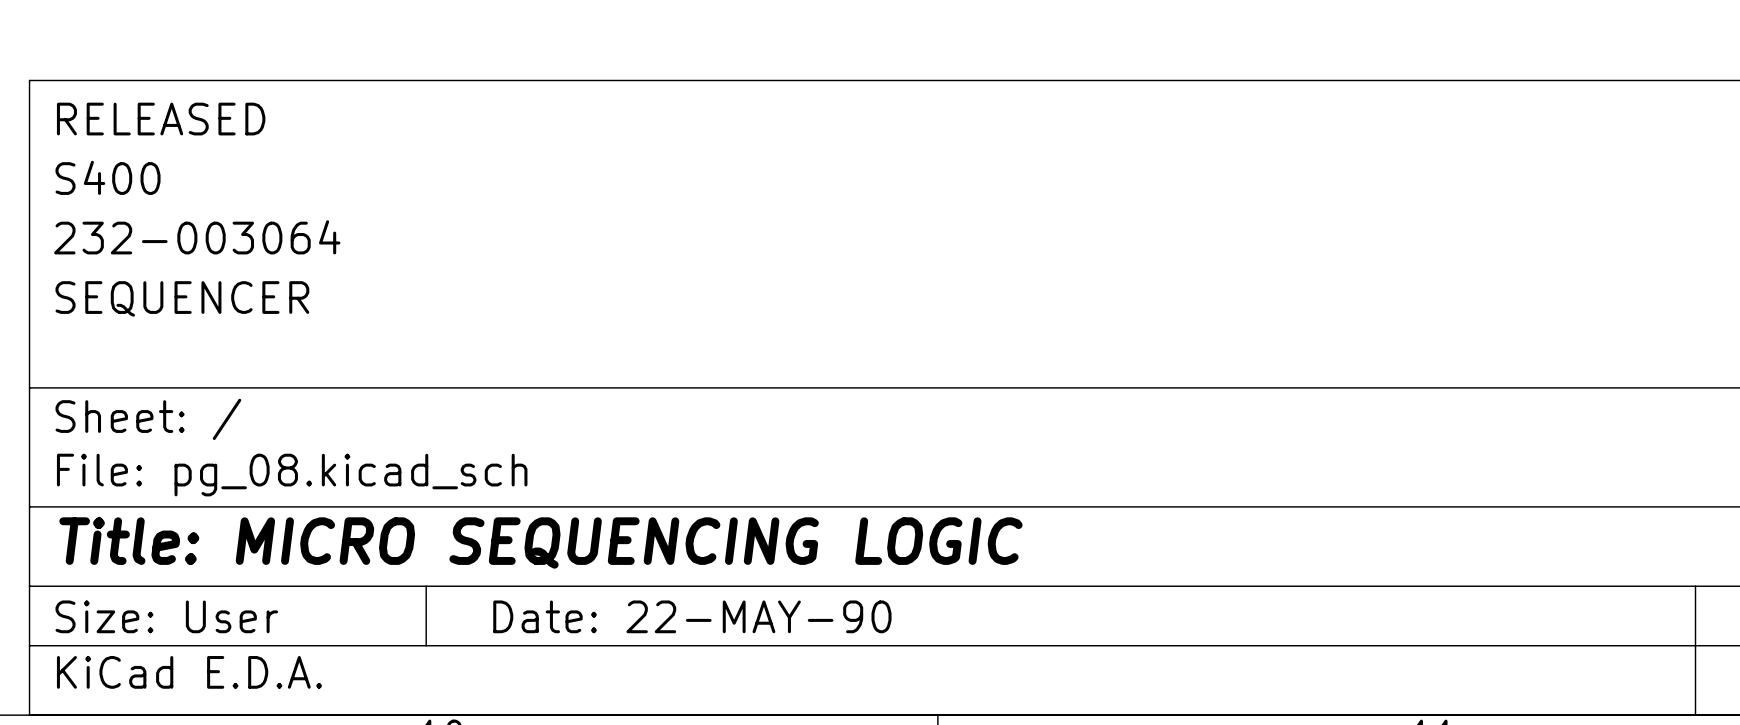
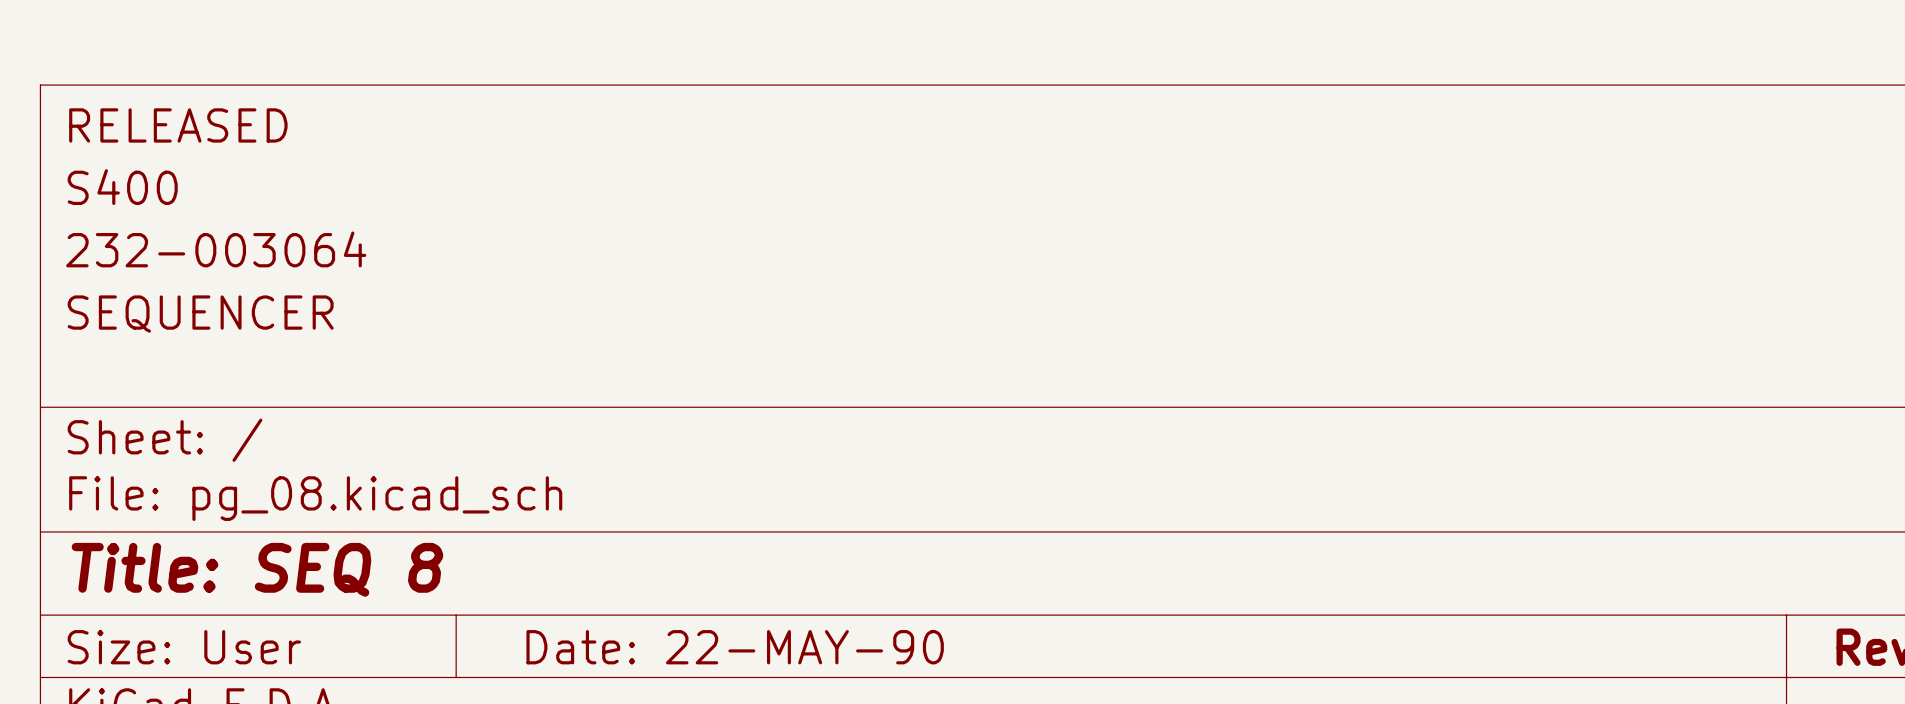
title block: Title: MICRO SEQUENCING LOGIC (540, 543) -> Title: SEQ 8 (257, 569)

